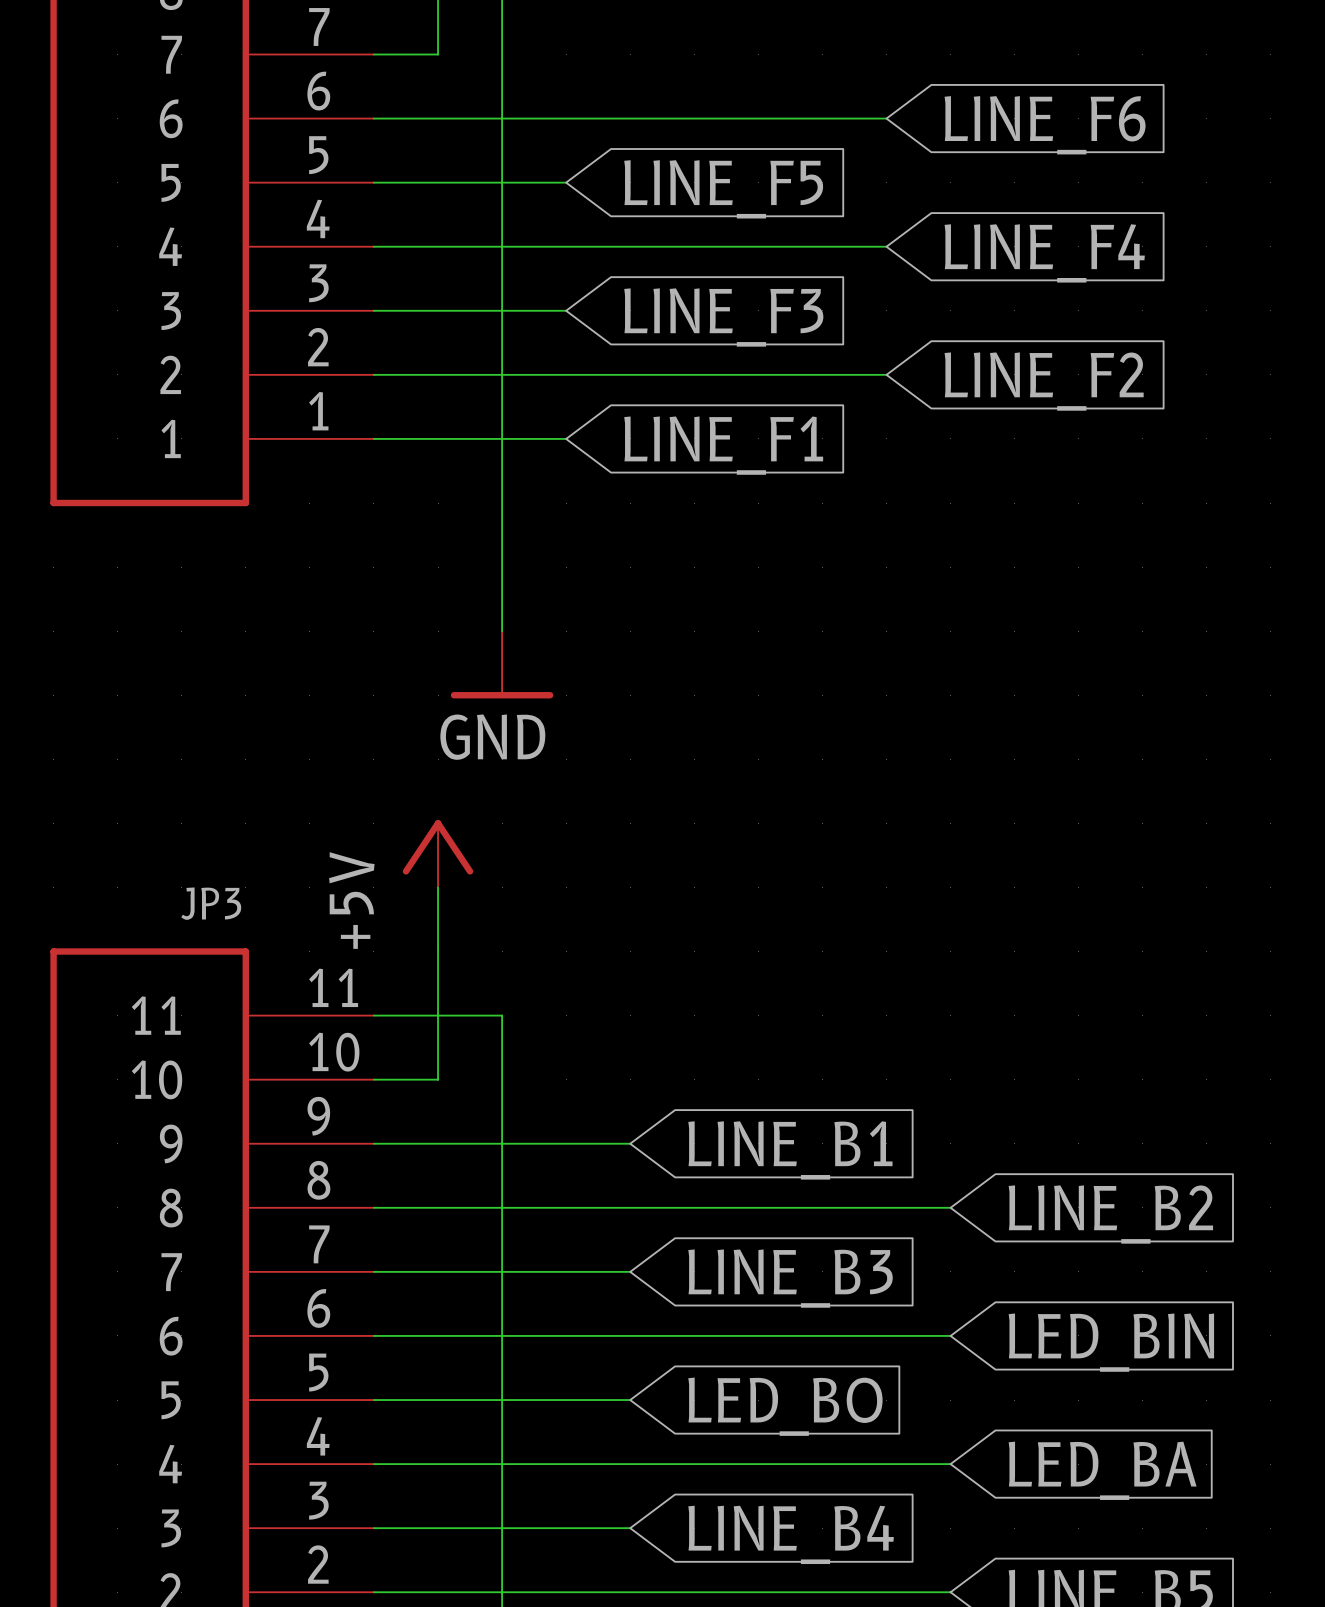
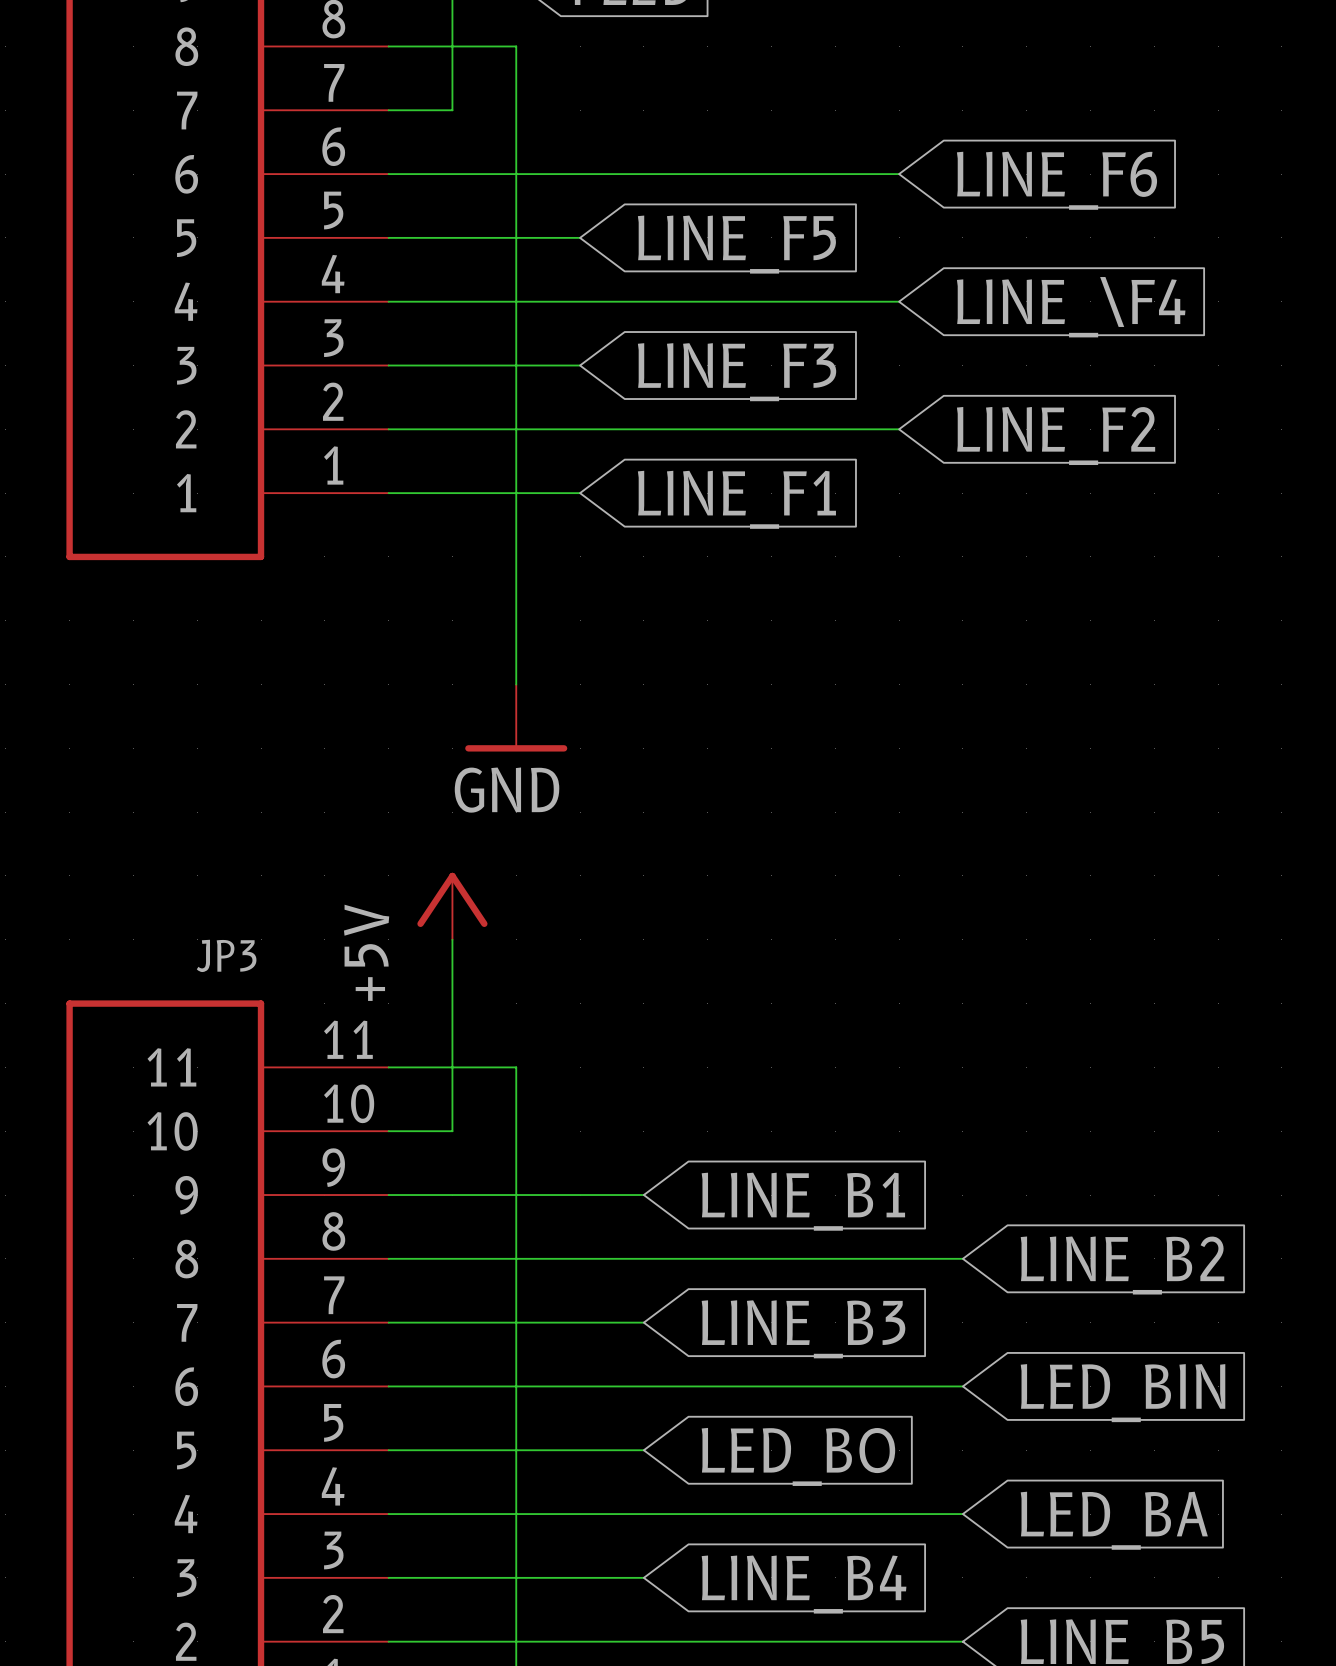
global label: LINE_F4 (1044, 253) -> LINE_\F4 (1071, 307)

